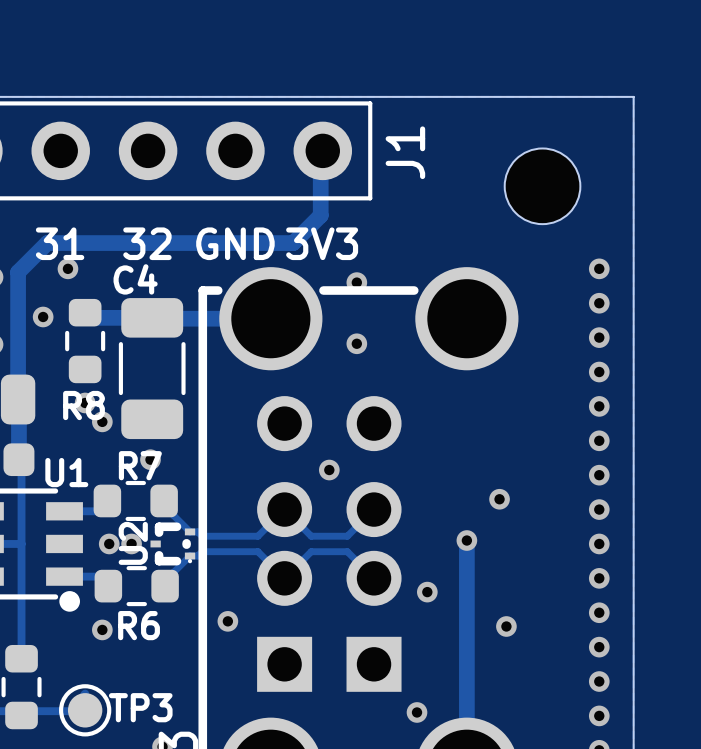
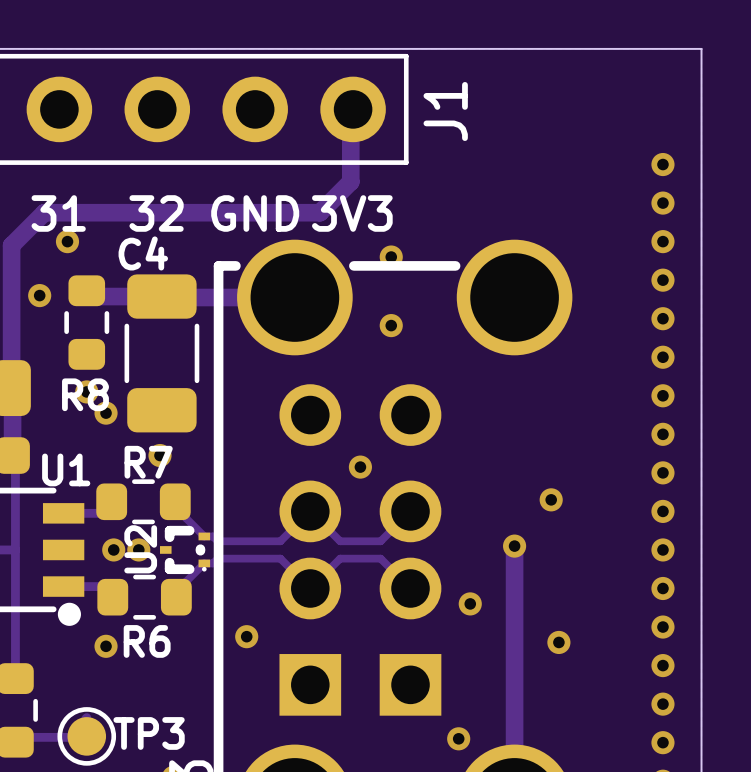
part: (542, 186) -> none
via: none -> (662, 164)
via: none -> (662, 203)

